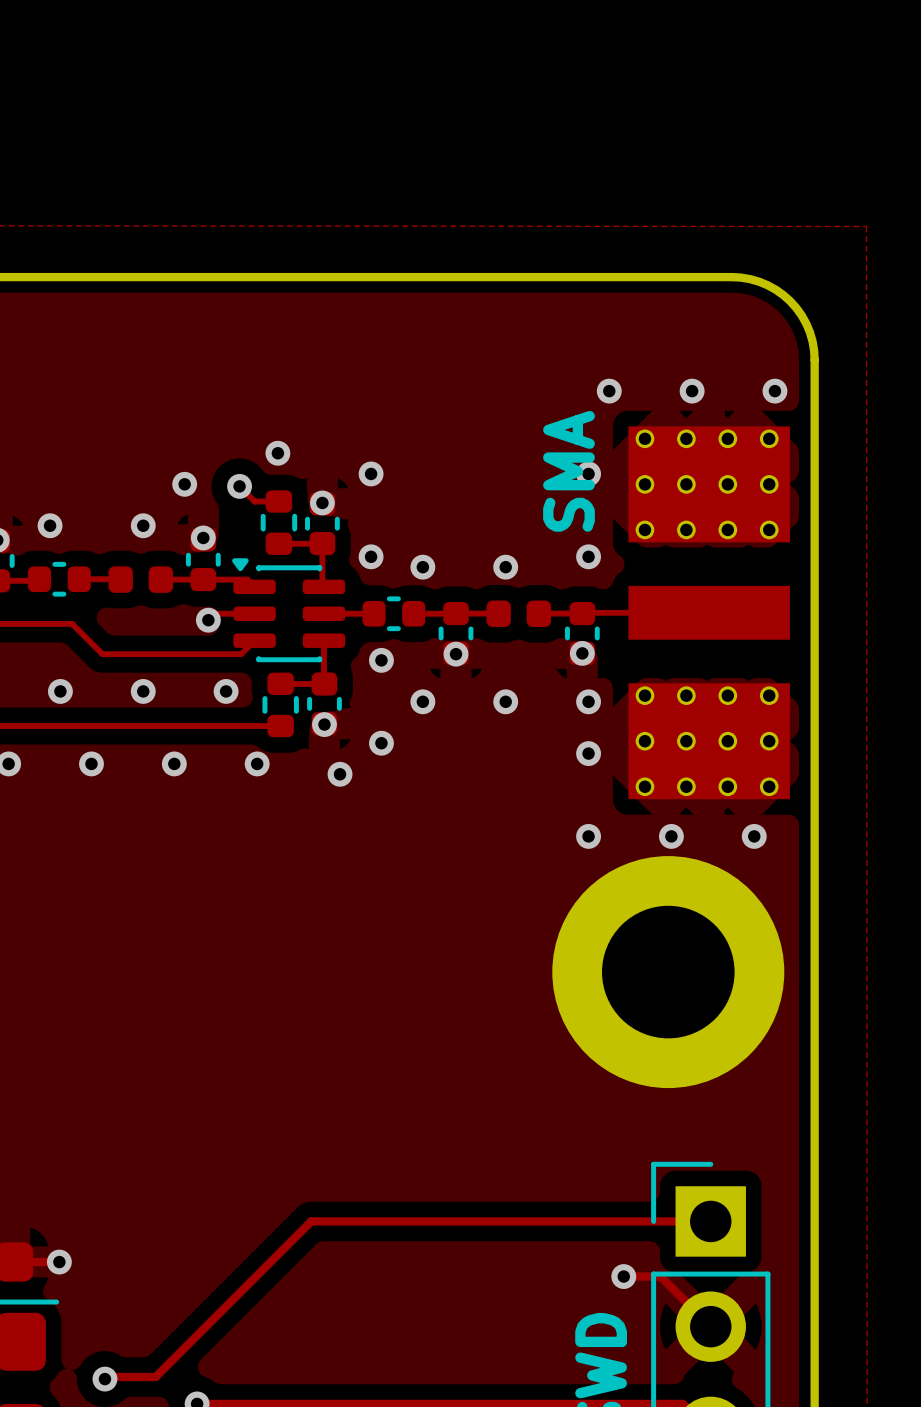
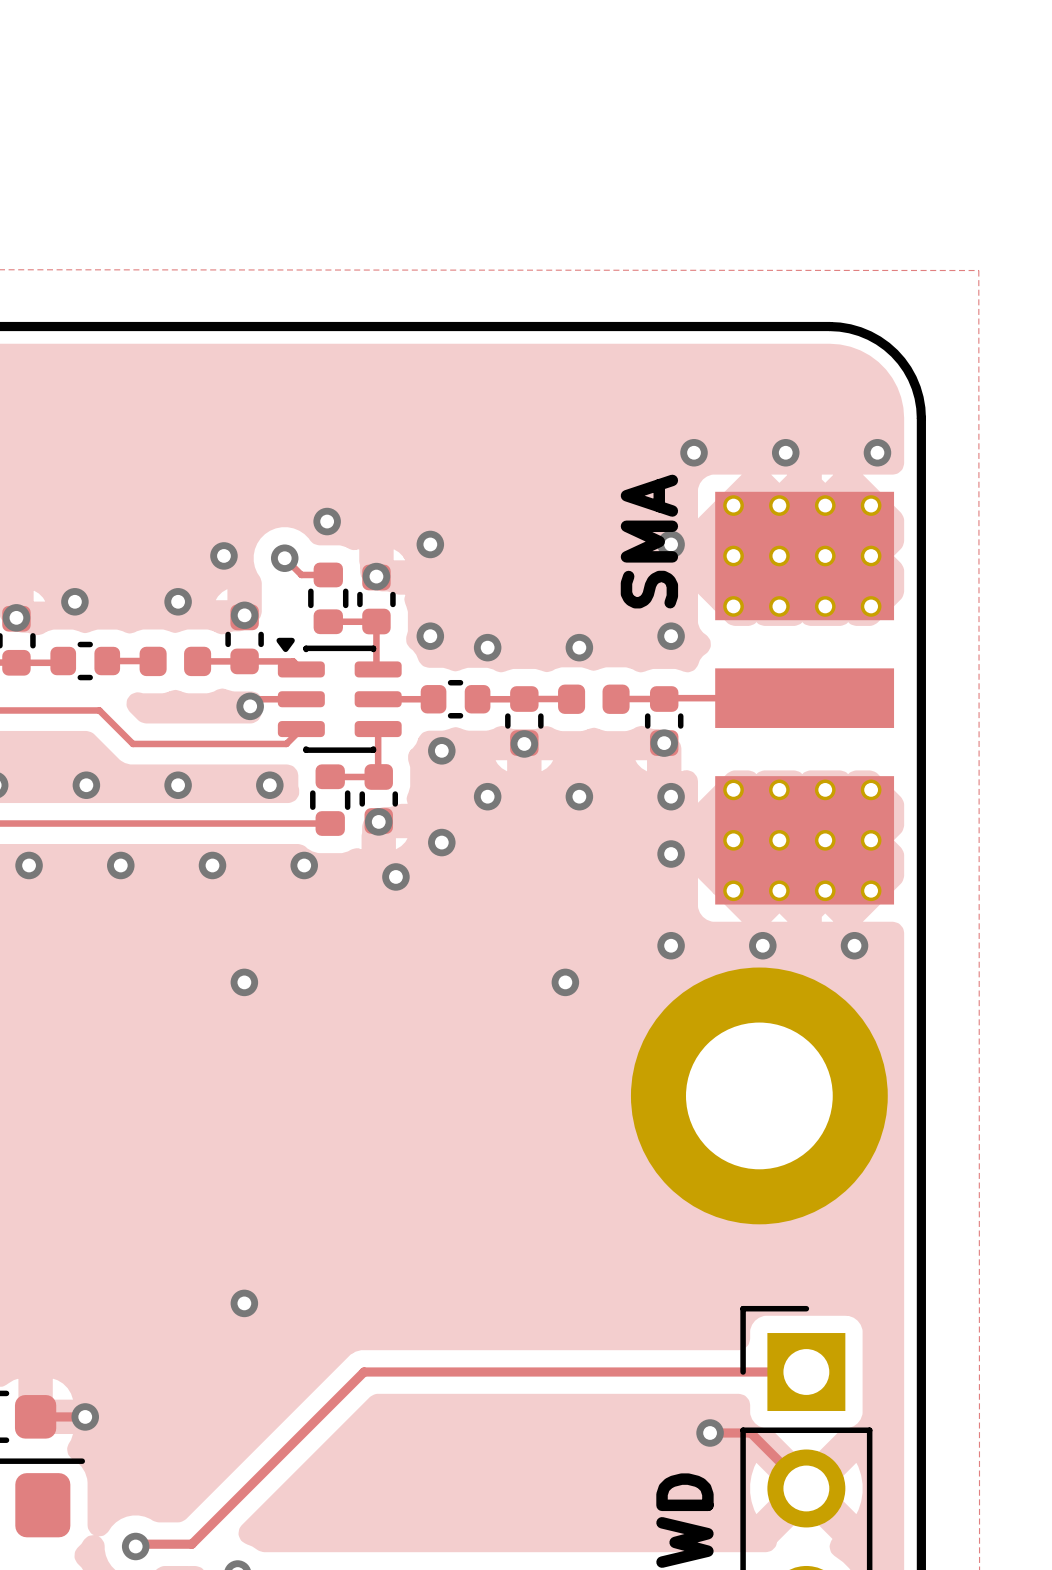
via: none -> (244, 982)
via: none -> (565, 982)
via: none -> (244, 1303)

